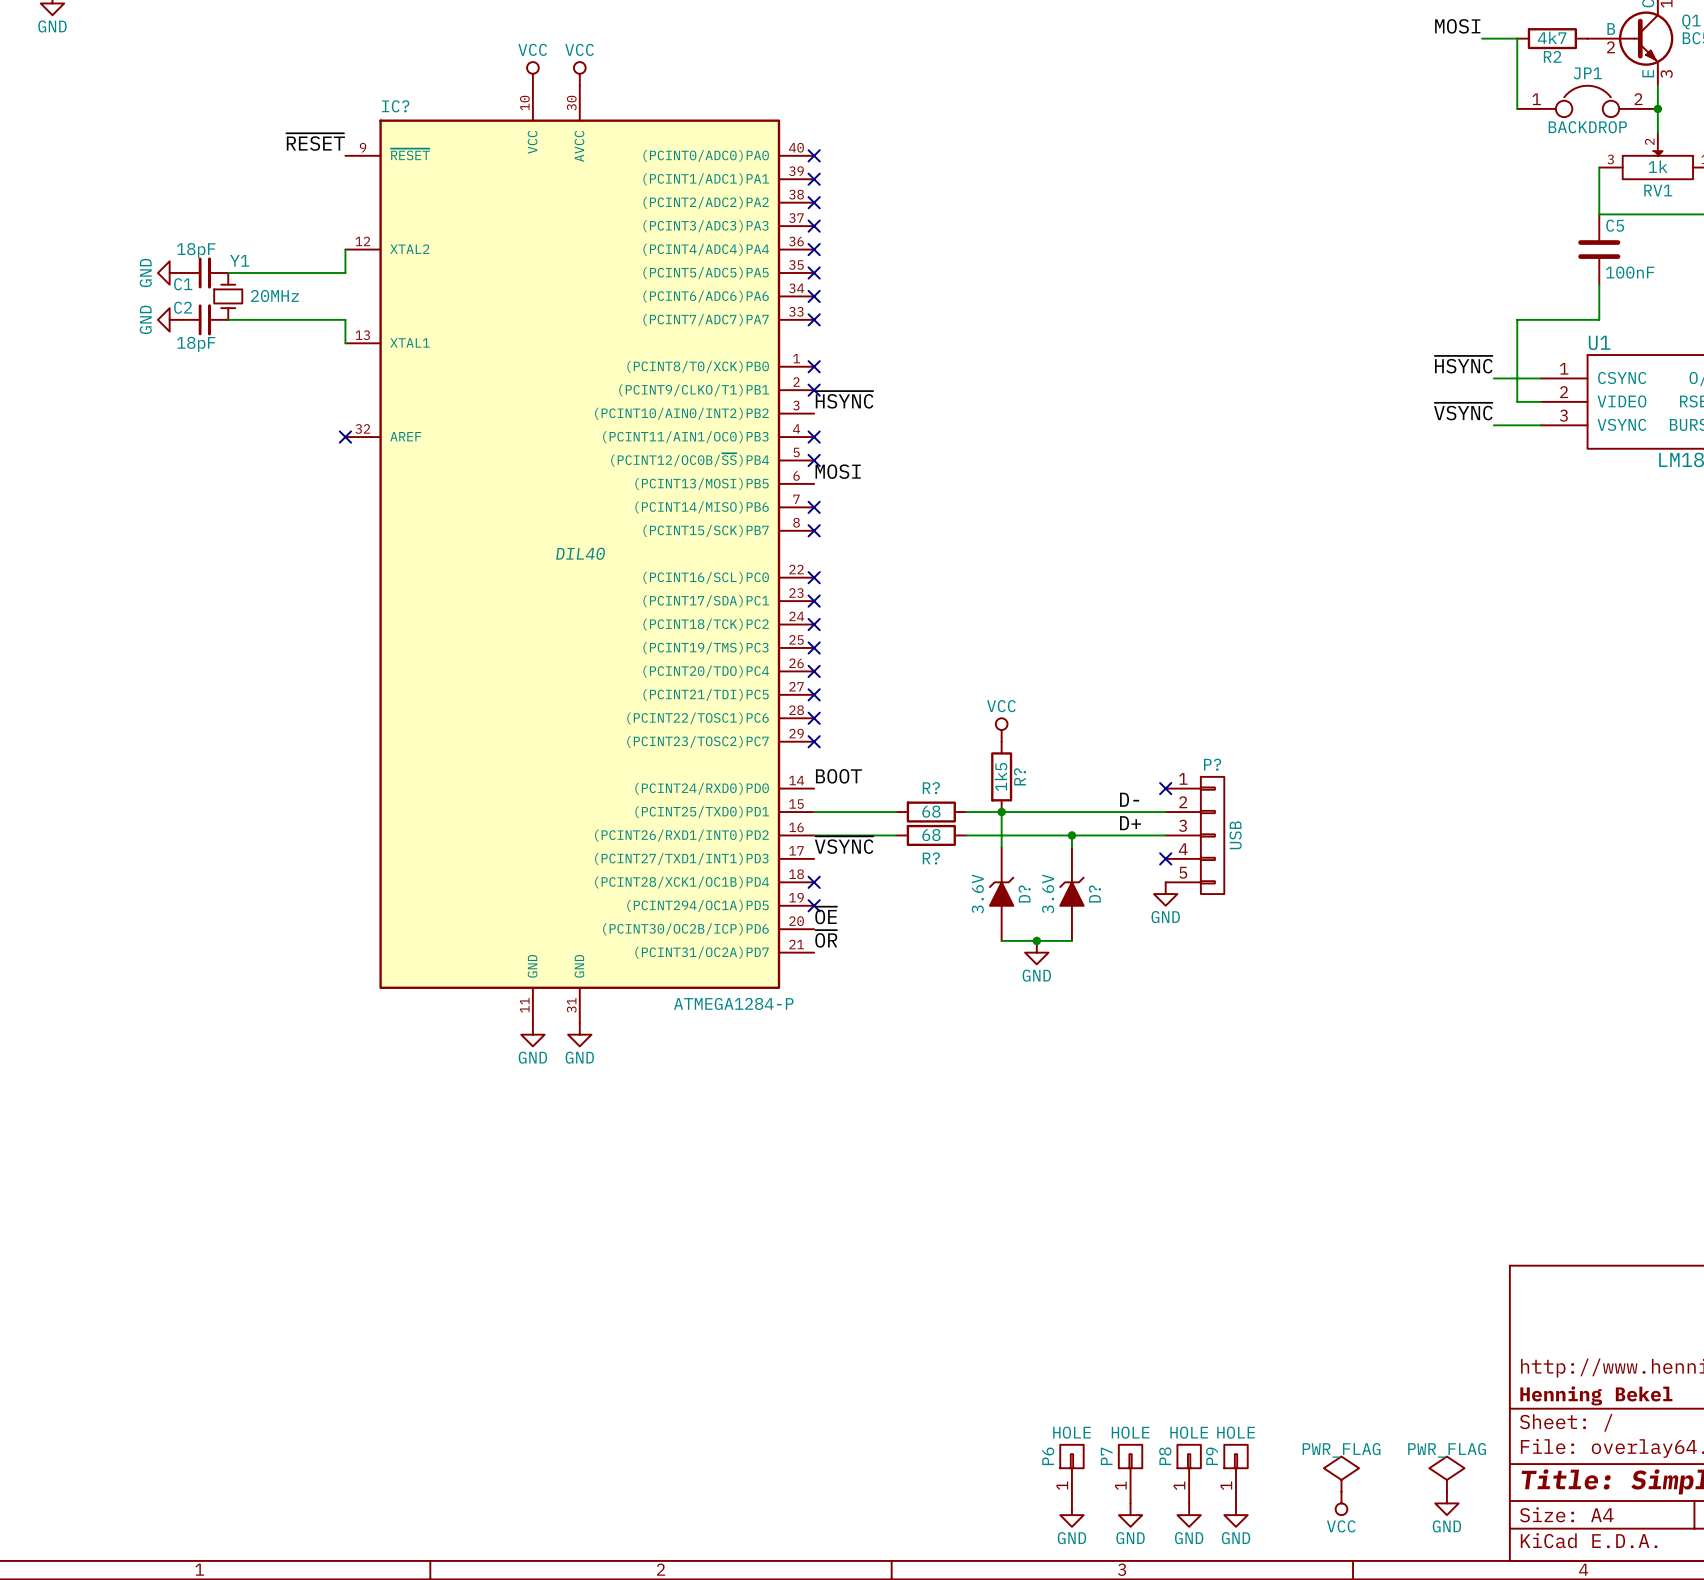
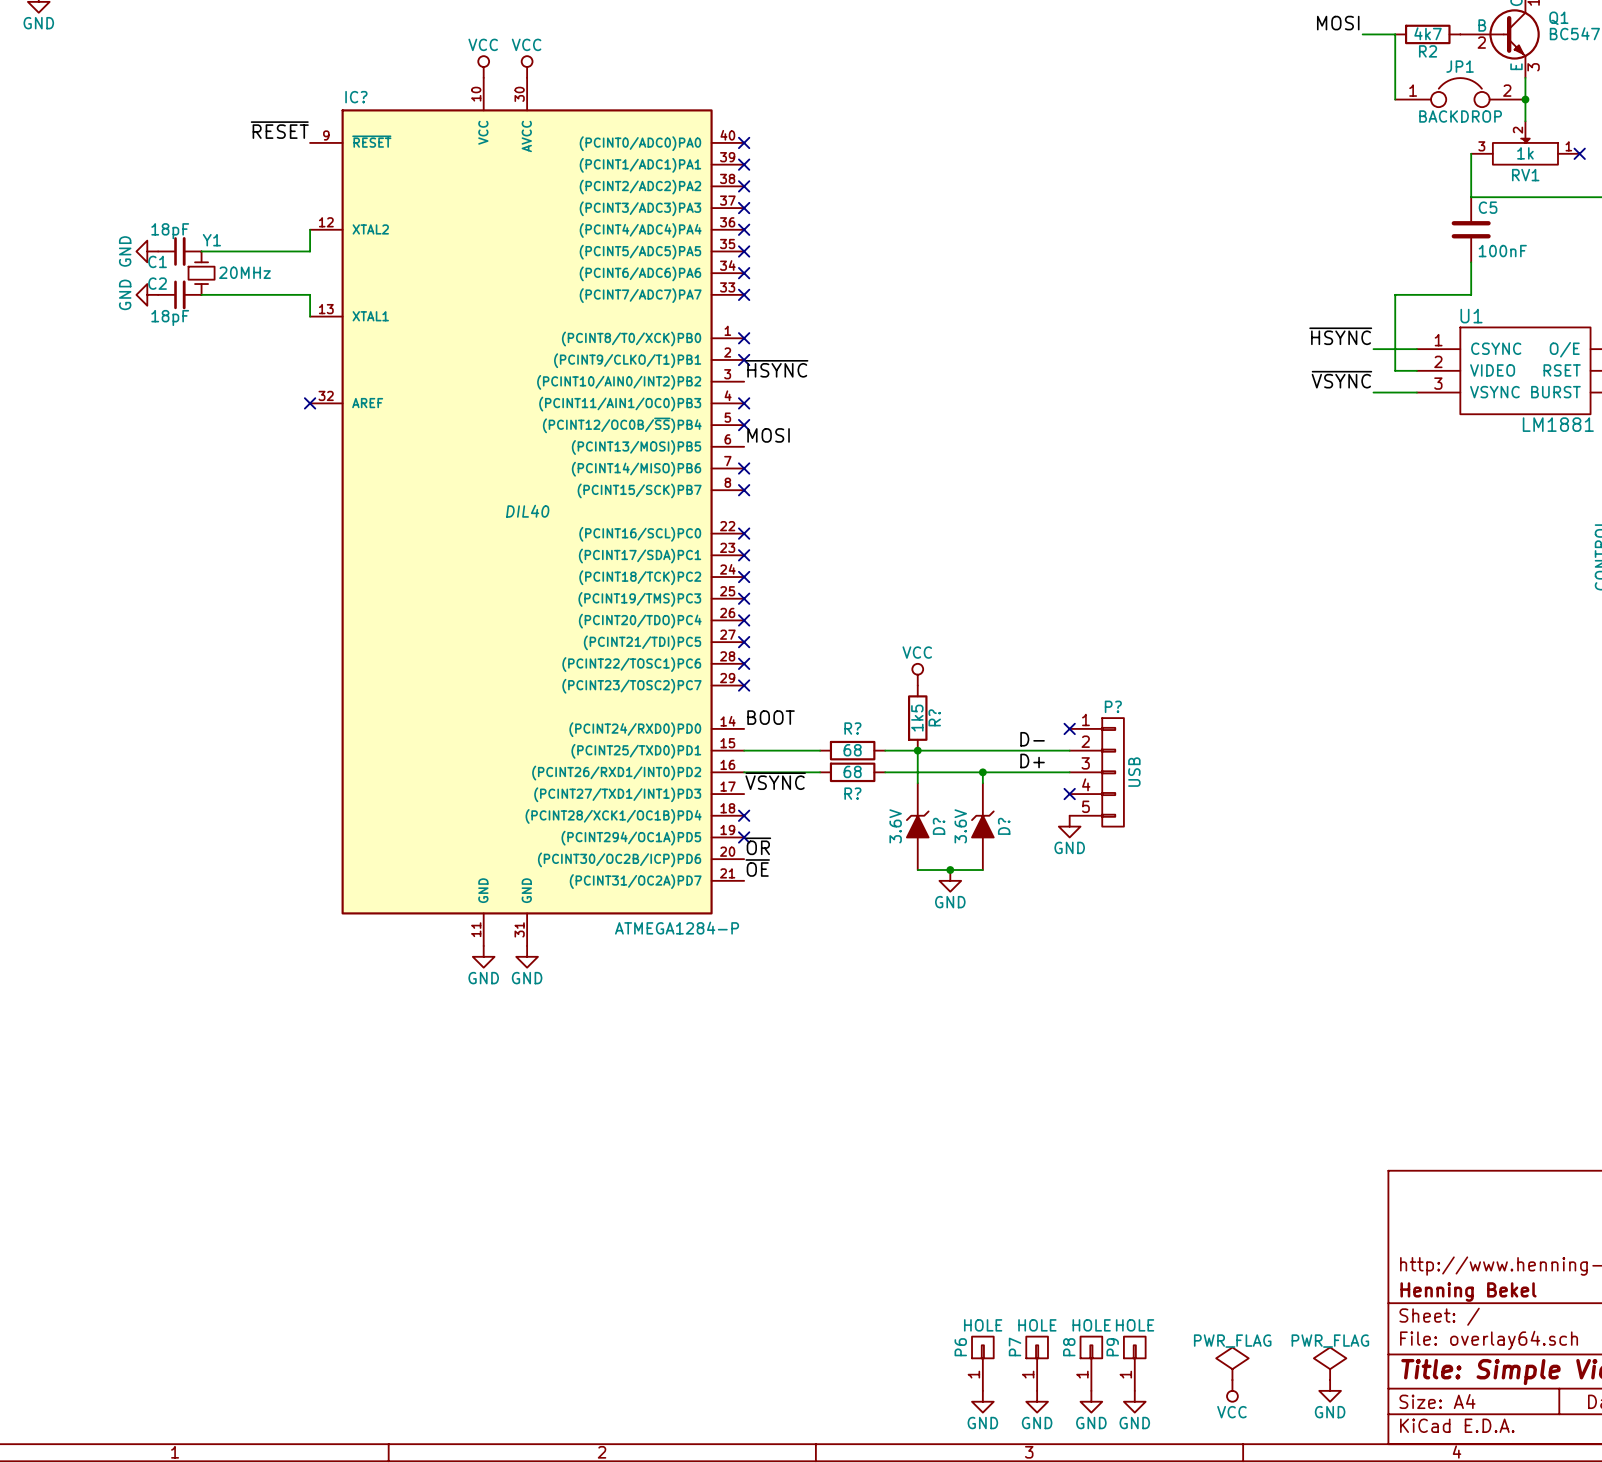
label: ~{OE} (826, 915) -> ~{OR} (758, 846)
label: ~{OR} (826, 938) -> ~{OE} (757, 868)

